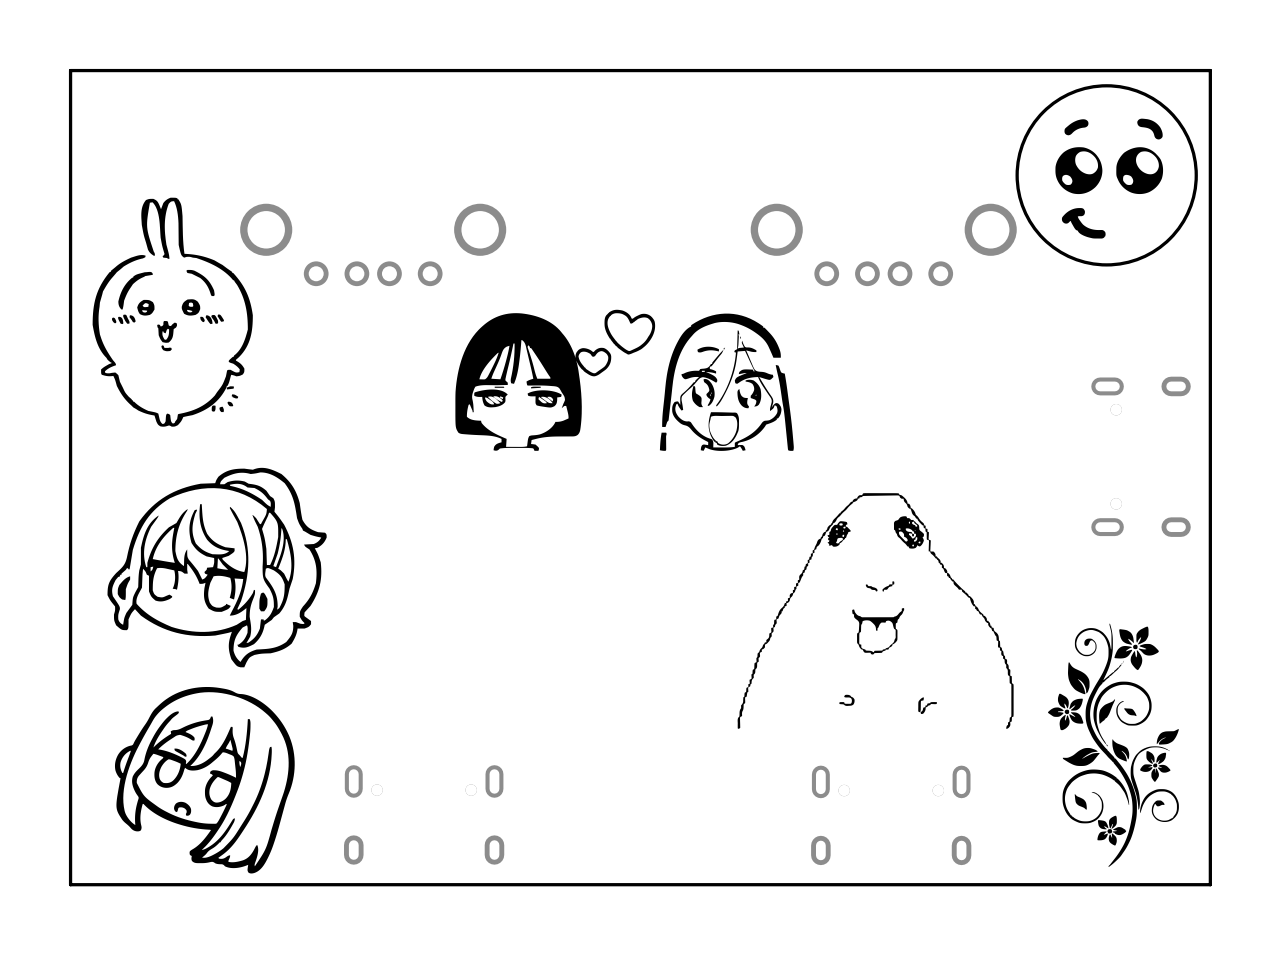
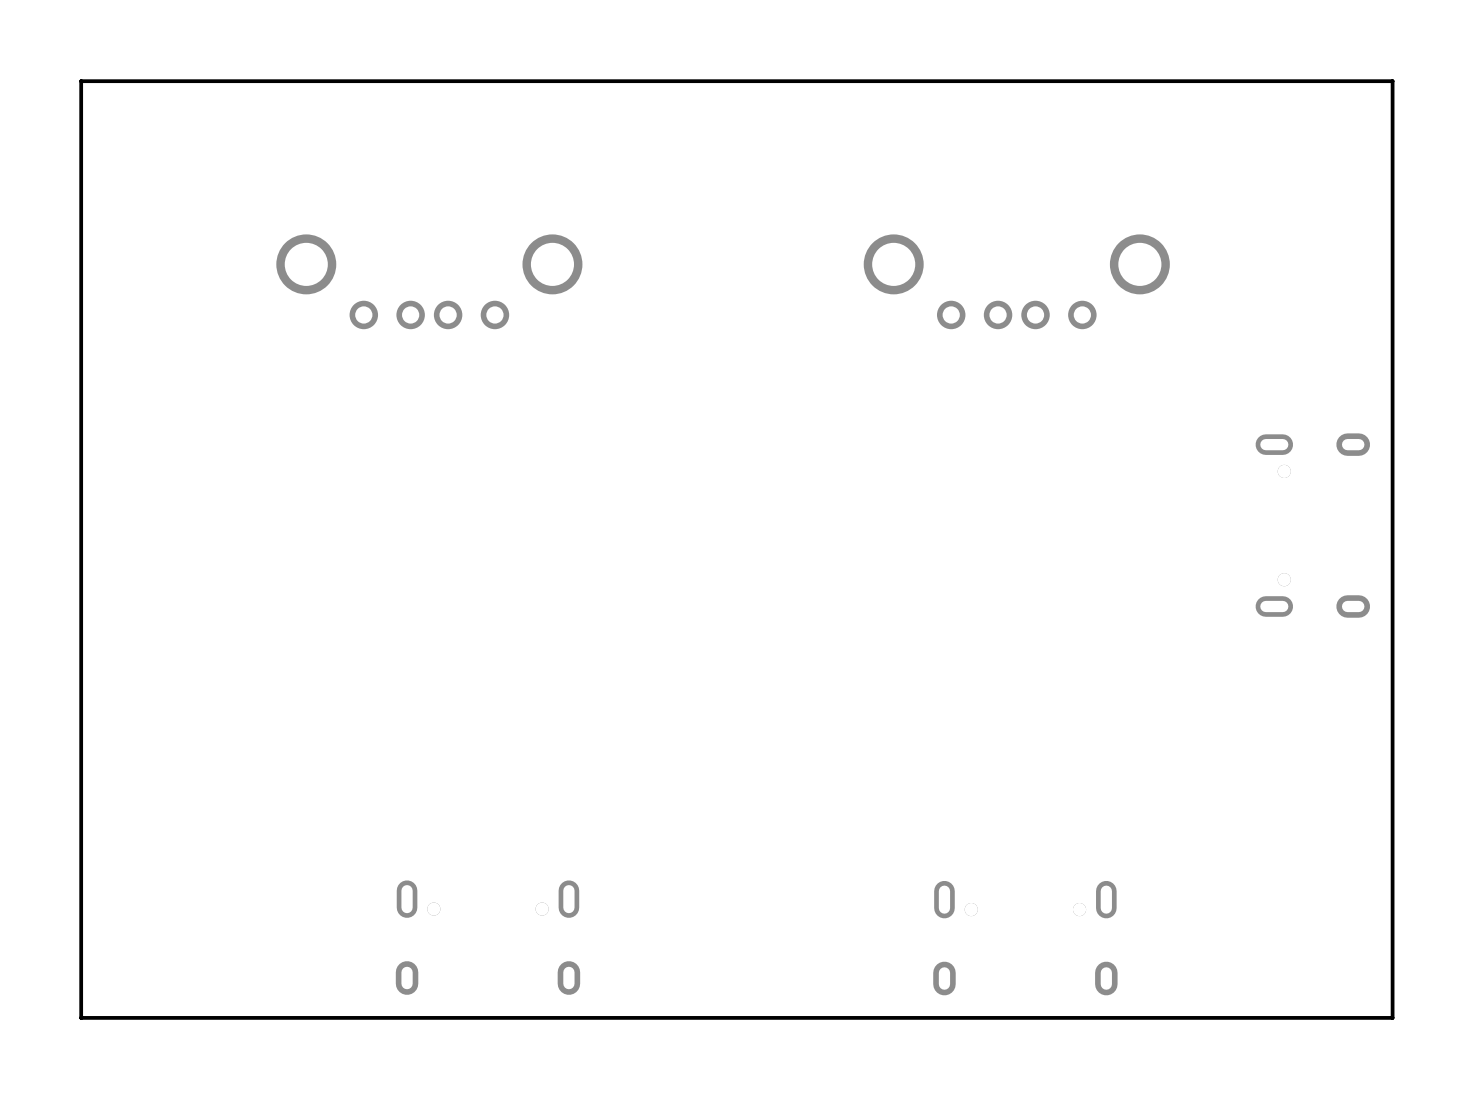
drawing: [1015, 84, 1198, 267] -> none
drawing: [92, 197, 253, 427] -> none
drawing: [455, 309, 794, 451] -> none
drawing: [107, 467, 327, 668] -> none
drawing: [737, 493, 1014, 729] -> none
drawing: [1048, 623, 1179, 867] -> none
drawing: [114, 686, 295, 874] -> none

